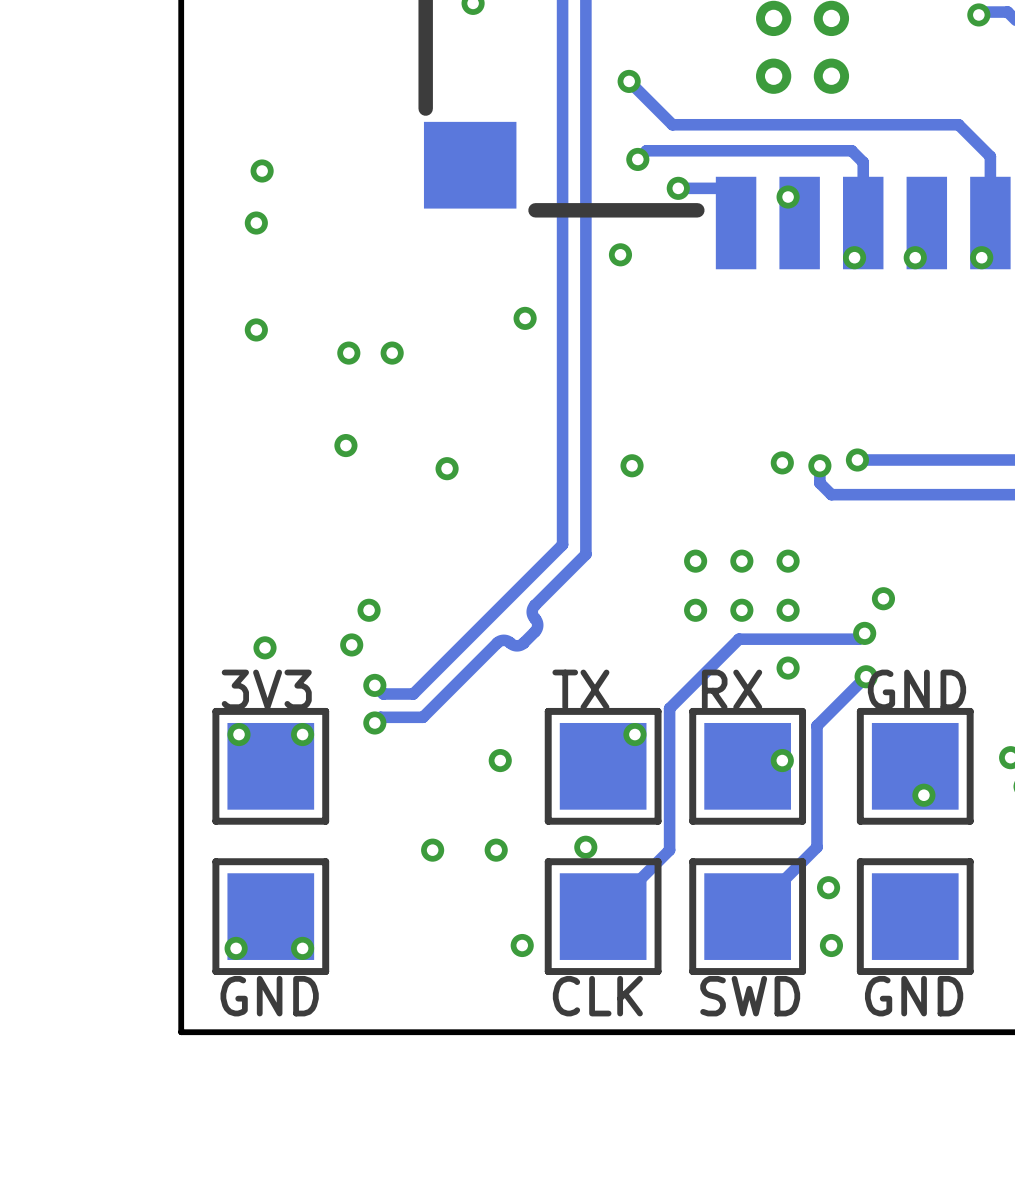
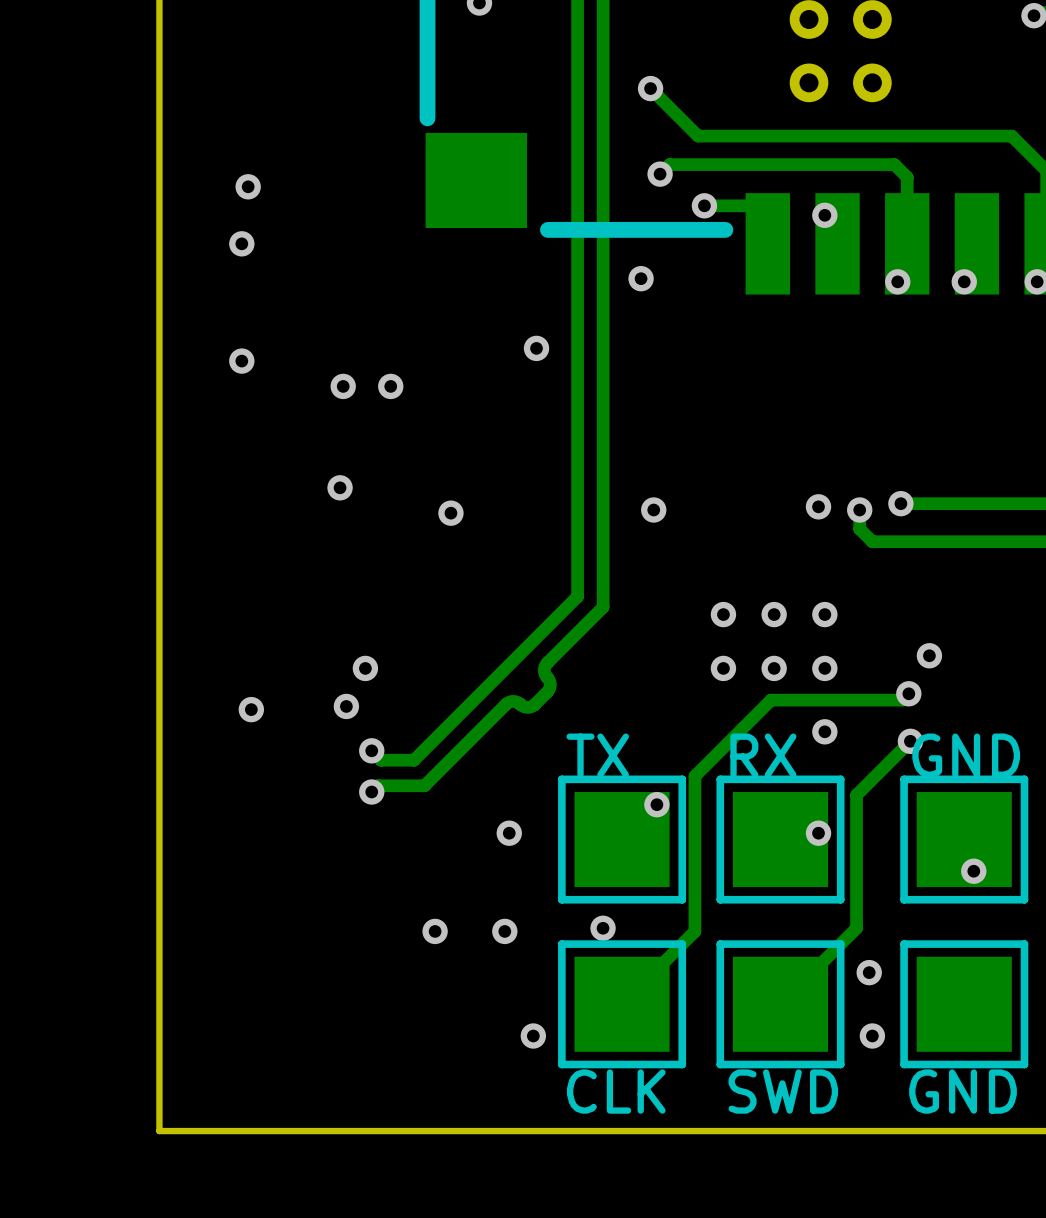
text: 3V3 (266, 689) -> none
via: (239, 734) -> none
via: (302, 734) -> none
part: (270, 766) -> none
part: (270, 916) -> none
via: (236, 948) -> none
via: (302, 948) -> none
text: GND (269, 996) -> none

